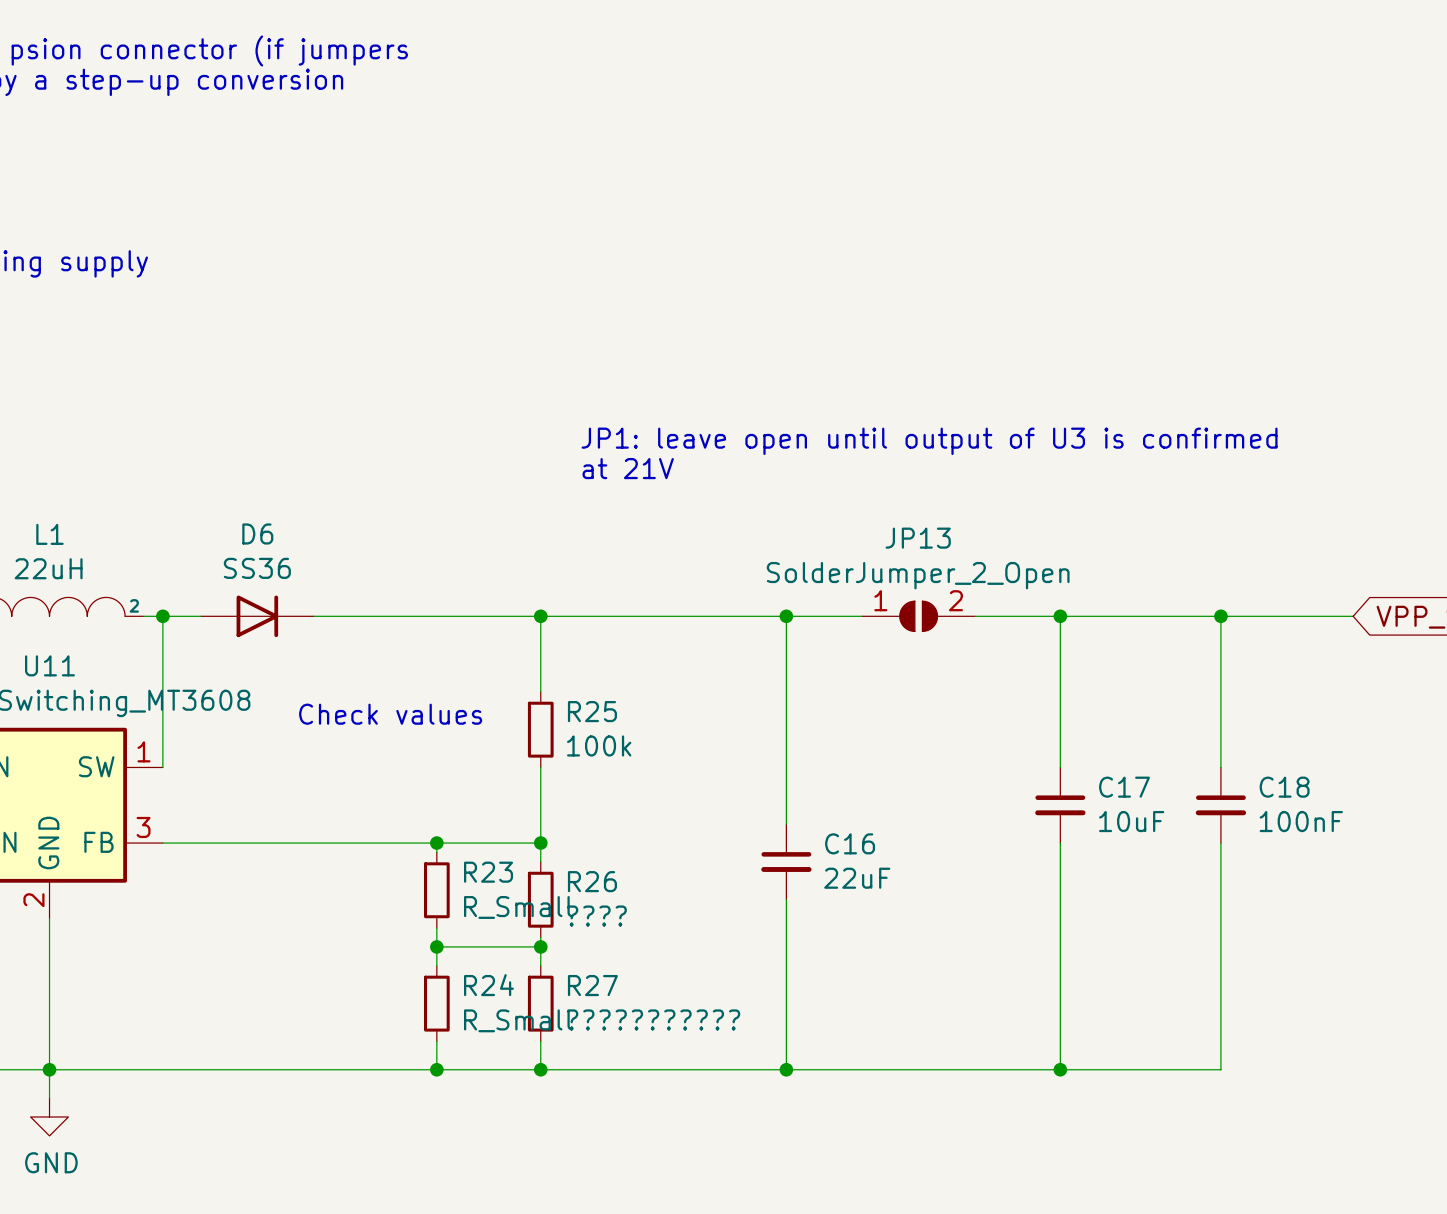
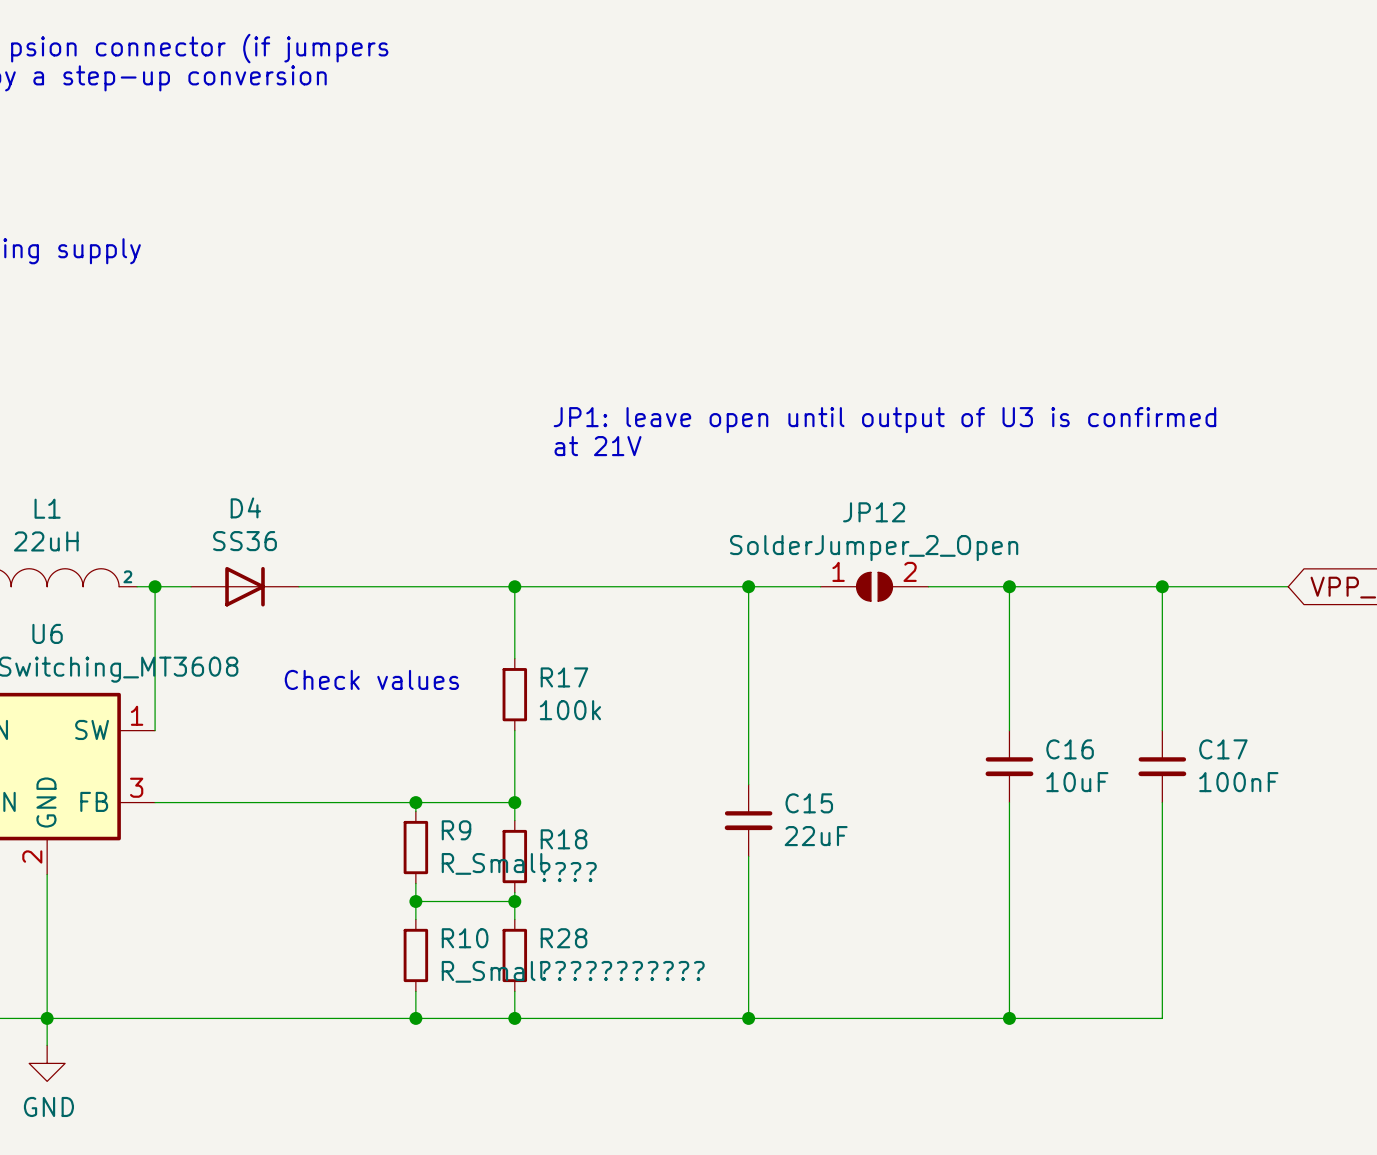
D6 name: D6 (257, 533) -> D4 (245, 507)
JP13 name: JP13 (918, 538) -> JP12 (874, 512)
U11 name: U11 (49, 665) -> U6 (47, 633)
R25 name: R25 (592, 711) -> R17 (564, 677)
C17 name: C17 (1124, 787) -> C16 (1070, 749)
C18 name: C18 (1284, 787) -> C17 (1223, 749)
C16 name: C16 (850, 843) -> C15 (809, 803)
R23 name: R23 (488, 872) -> R9 (456, 830)
R26 name: R26 (592, 881) -> R18 (564, 839)
R24 name: R24 (488, 985) -> R10 (465, 938)
R27 name: R27 (592, 985) -> R28 (564, 938)

